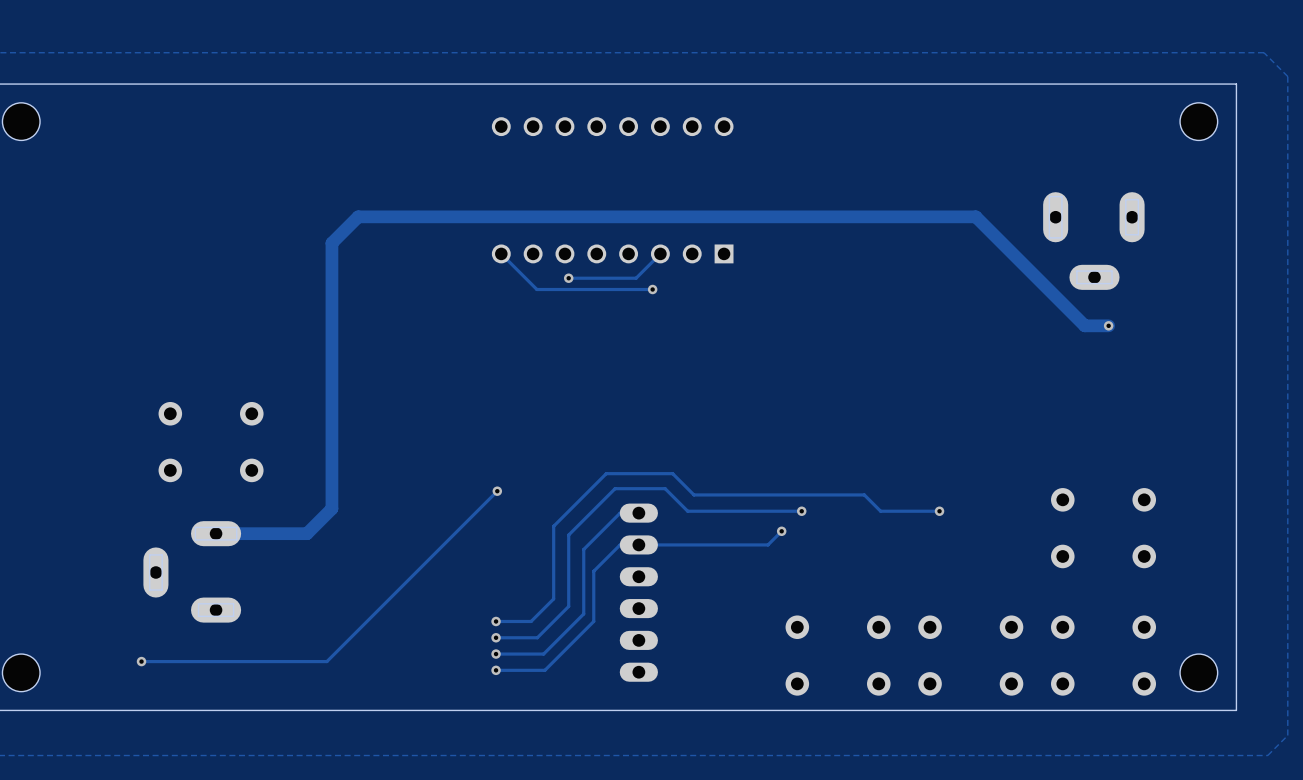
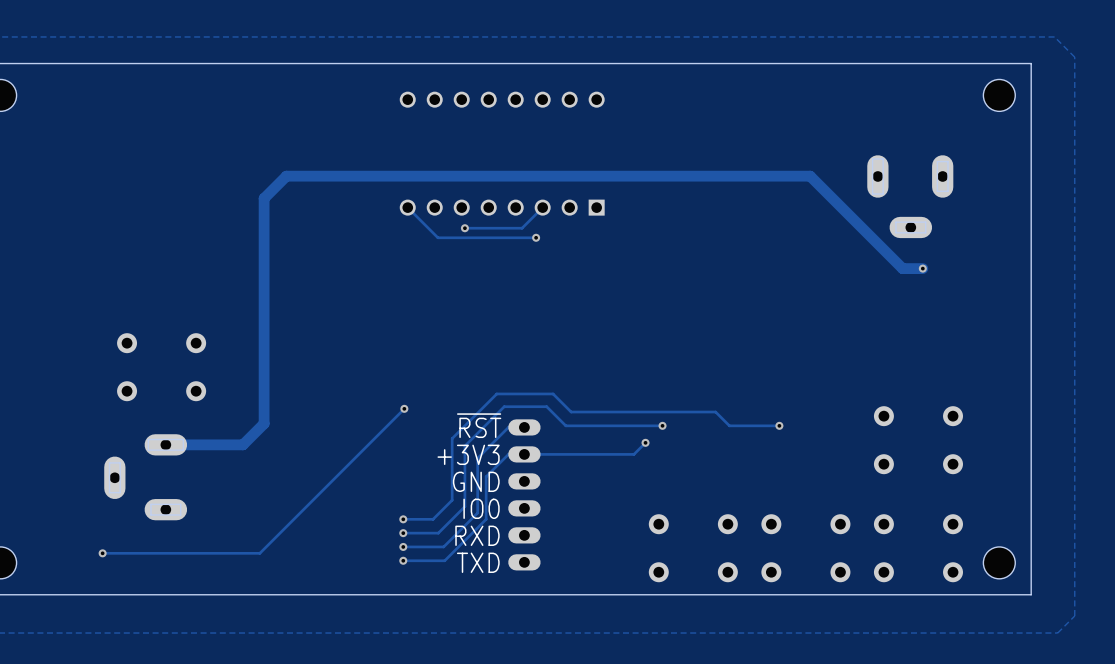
text: none -> ~{RST} (479, 425)
text: none -> +3V3 (468, 454)
text: none -> GND (476, 481)
text: none -> IO0 (481, 508)
text: none -> RXD (477, 535)
text: none -> TXD (478, 562)

